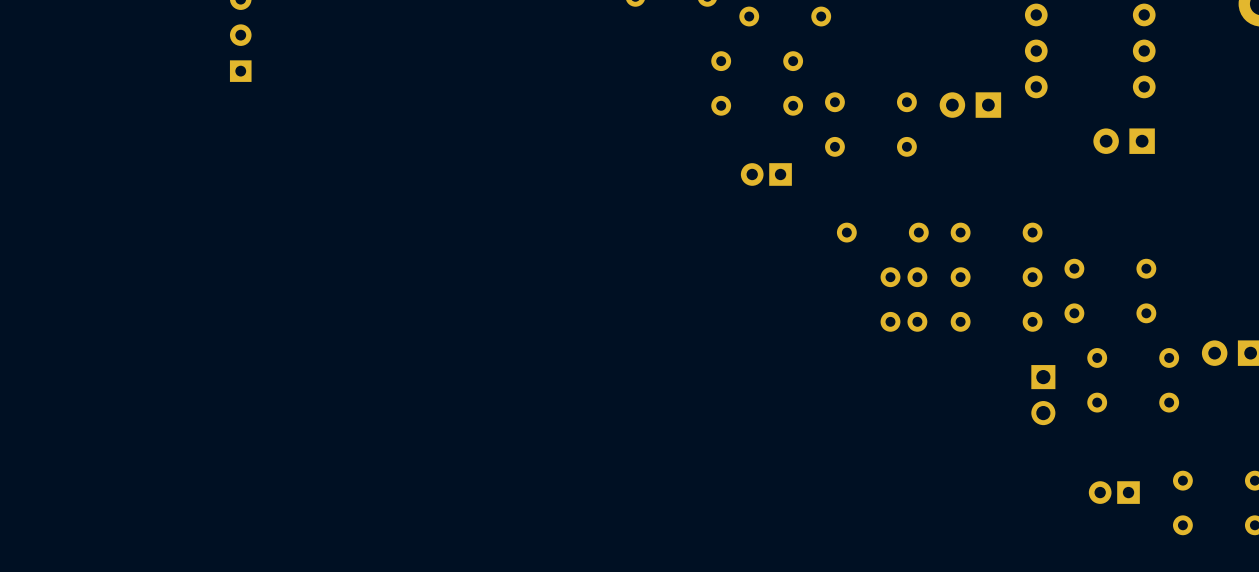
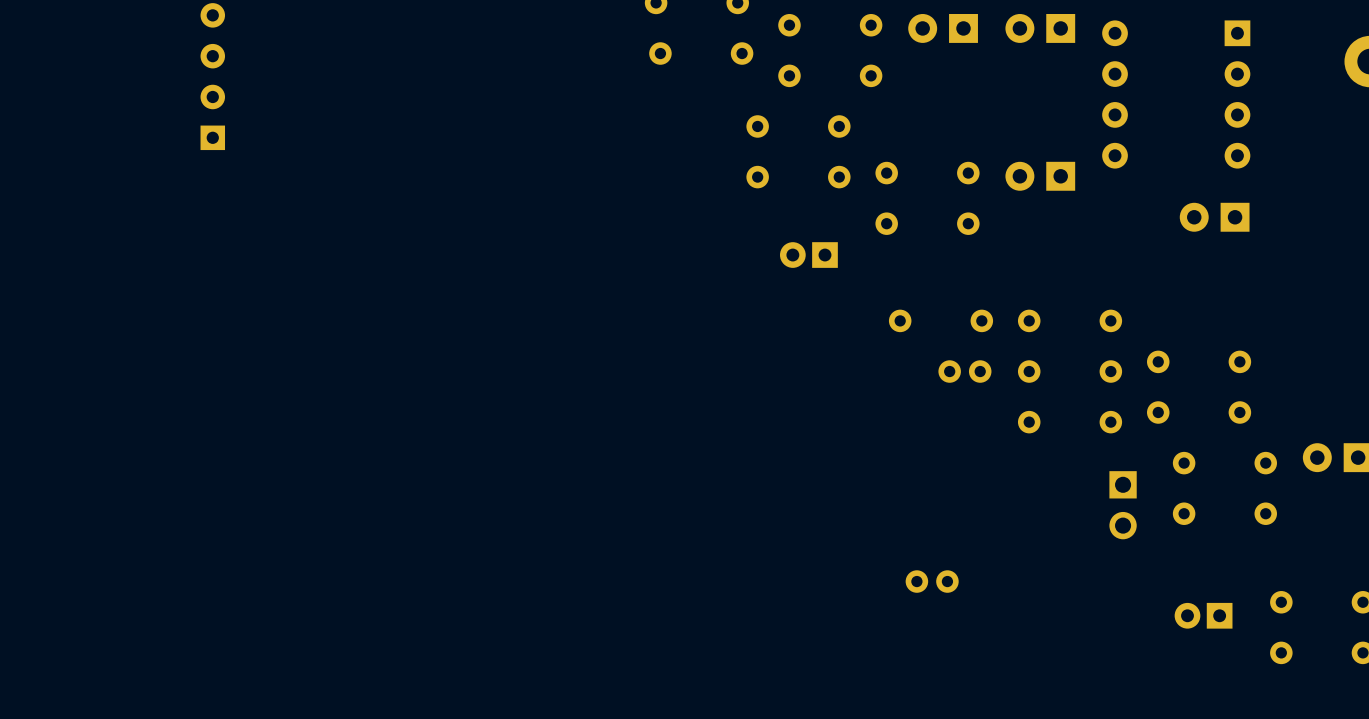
part position: (903, 321) -> (932, 581)

